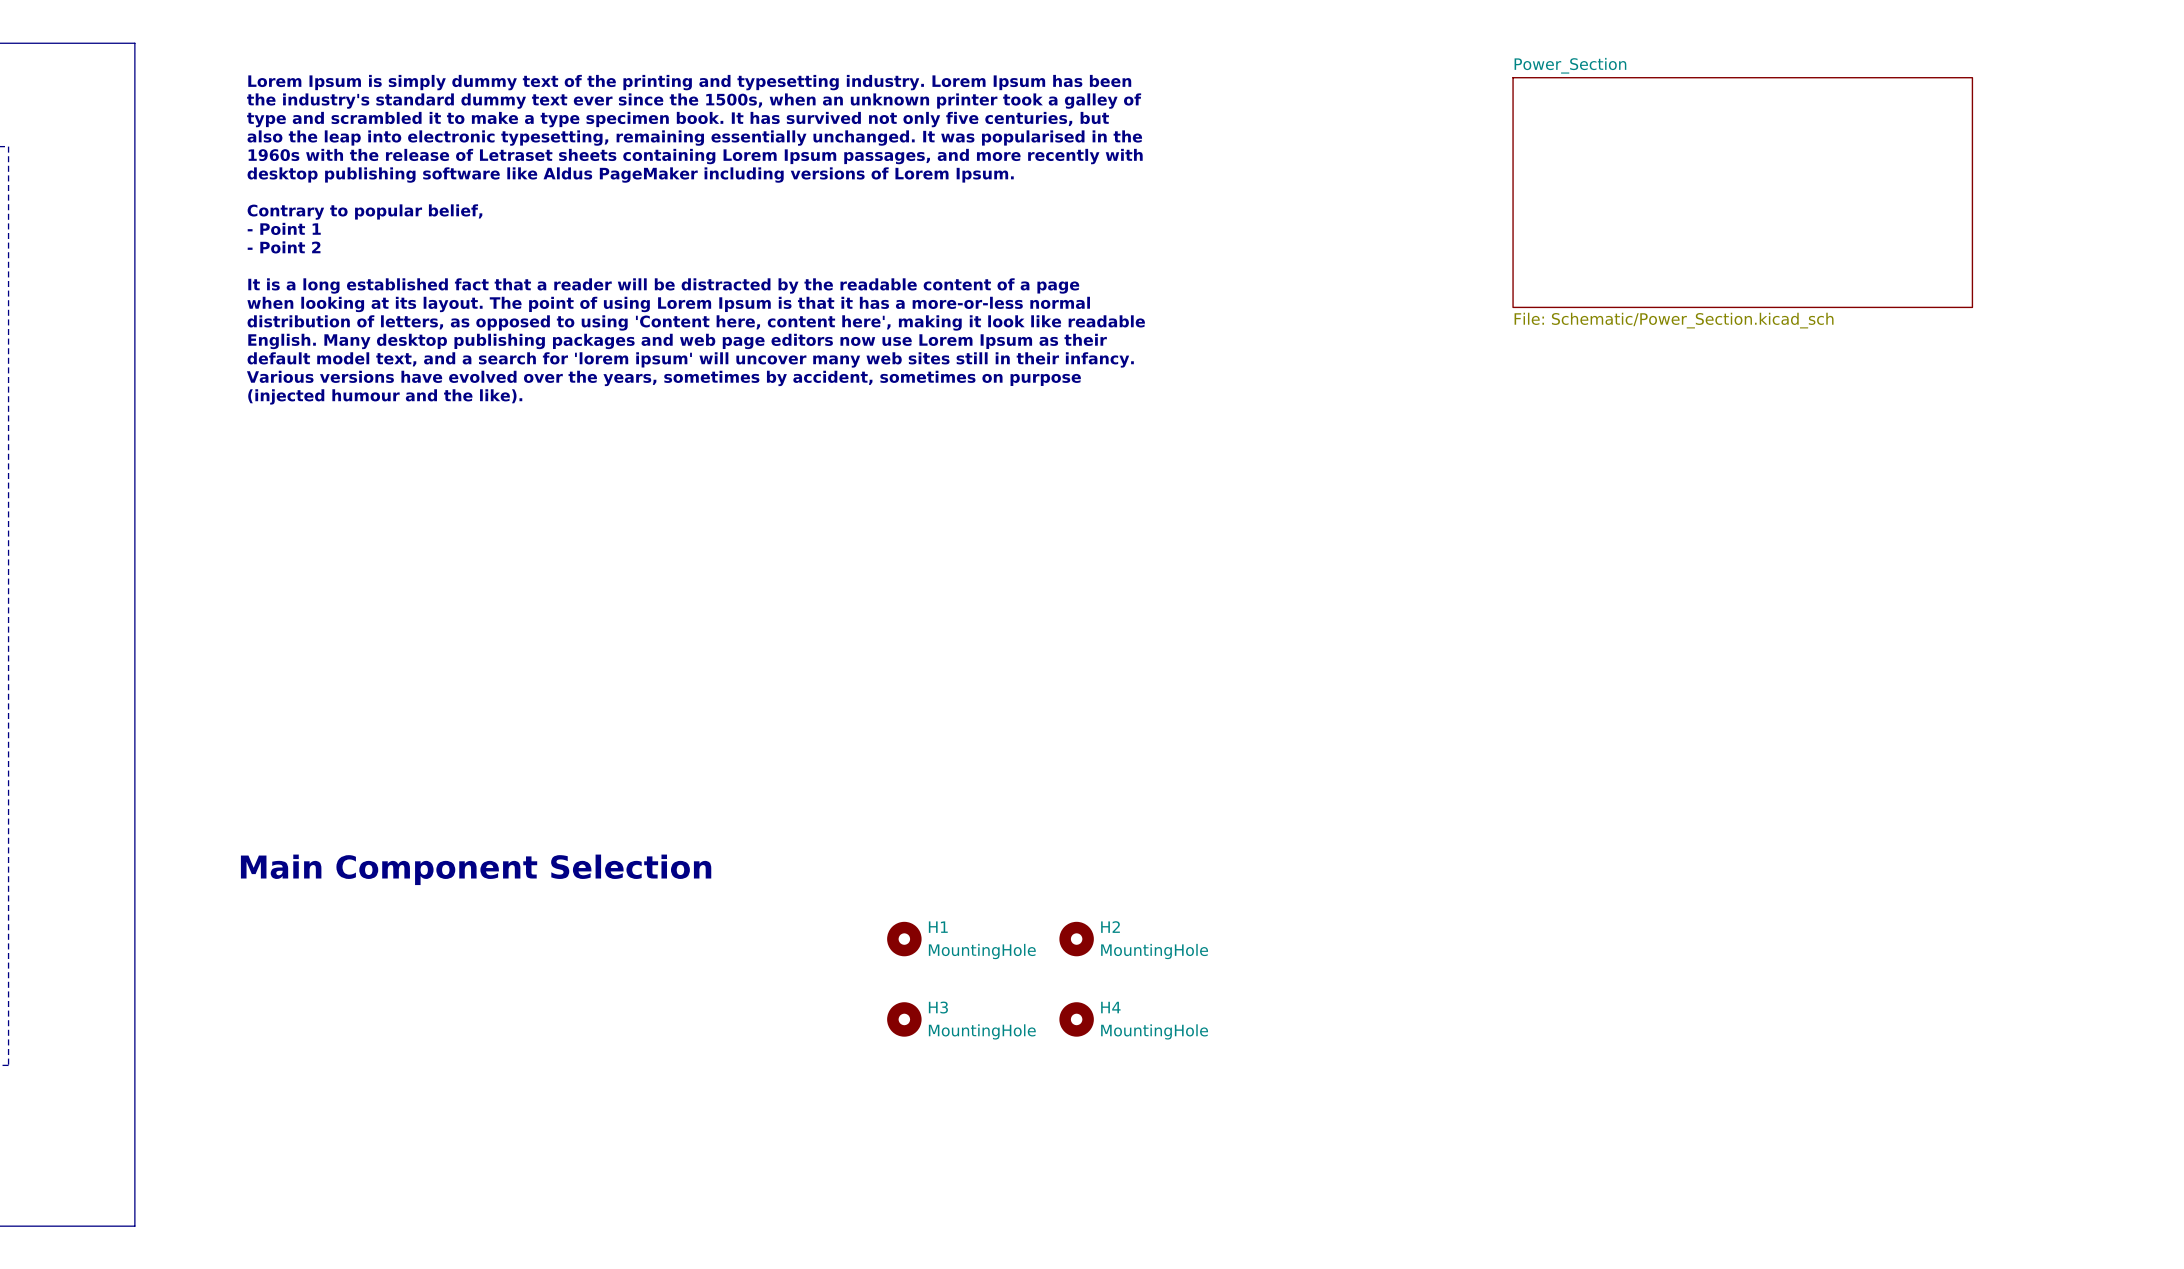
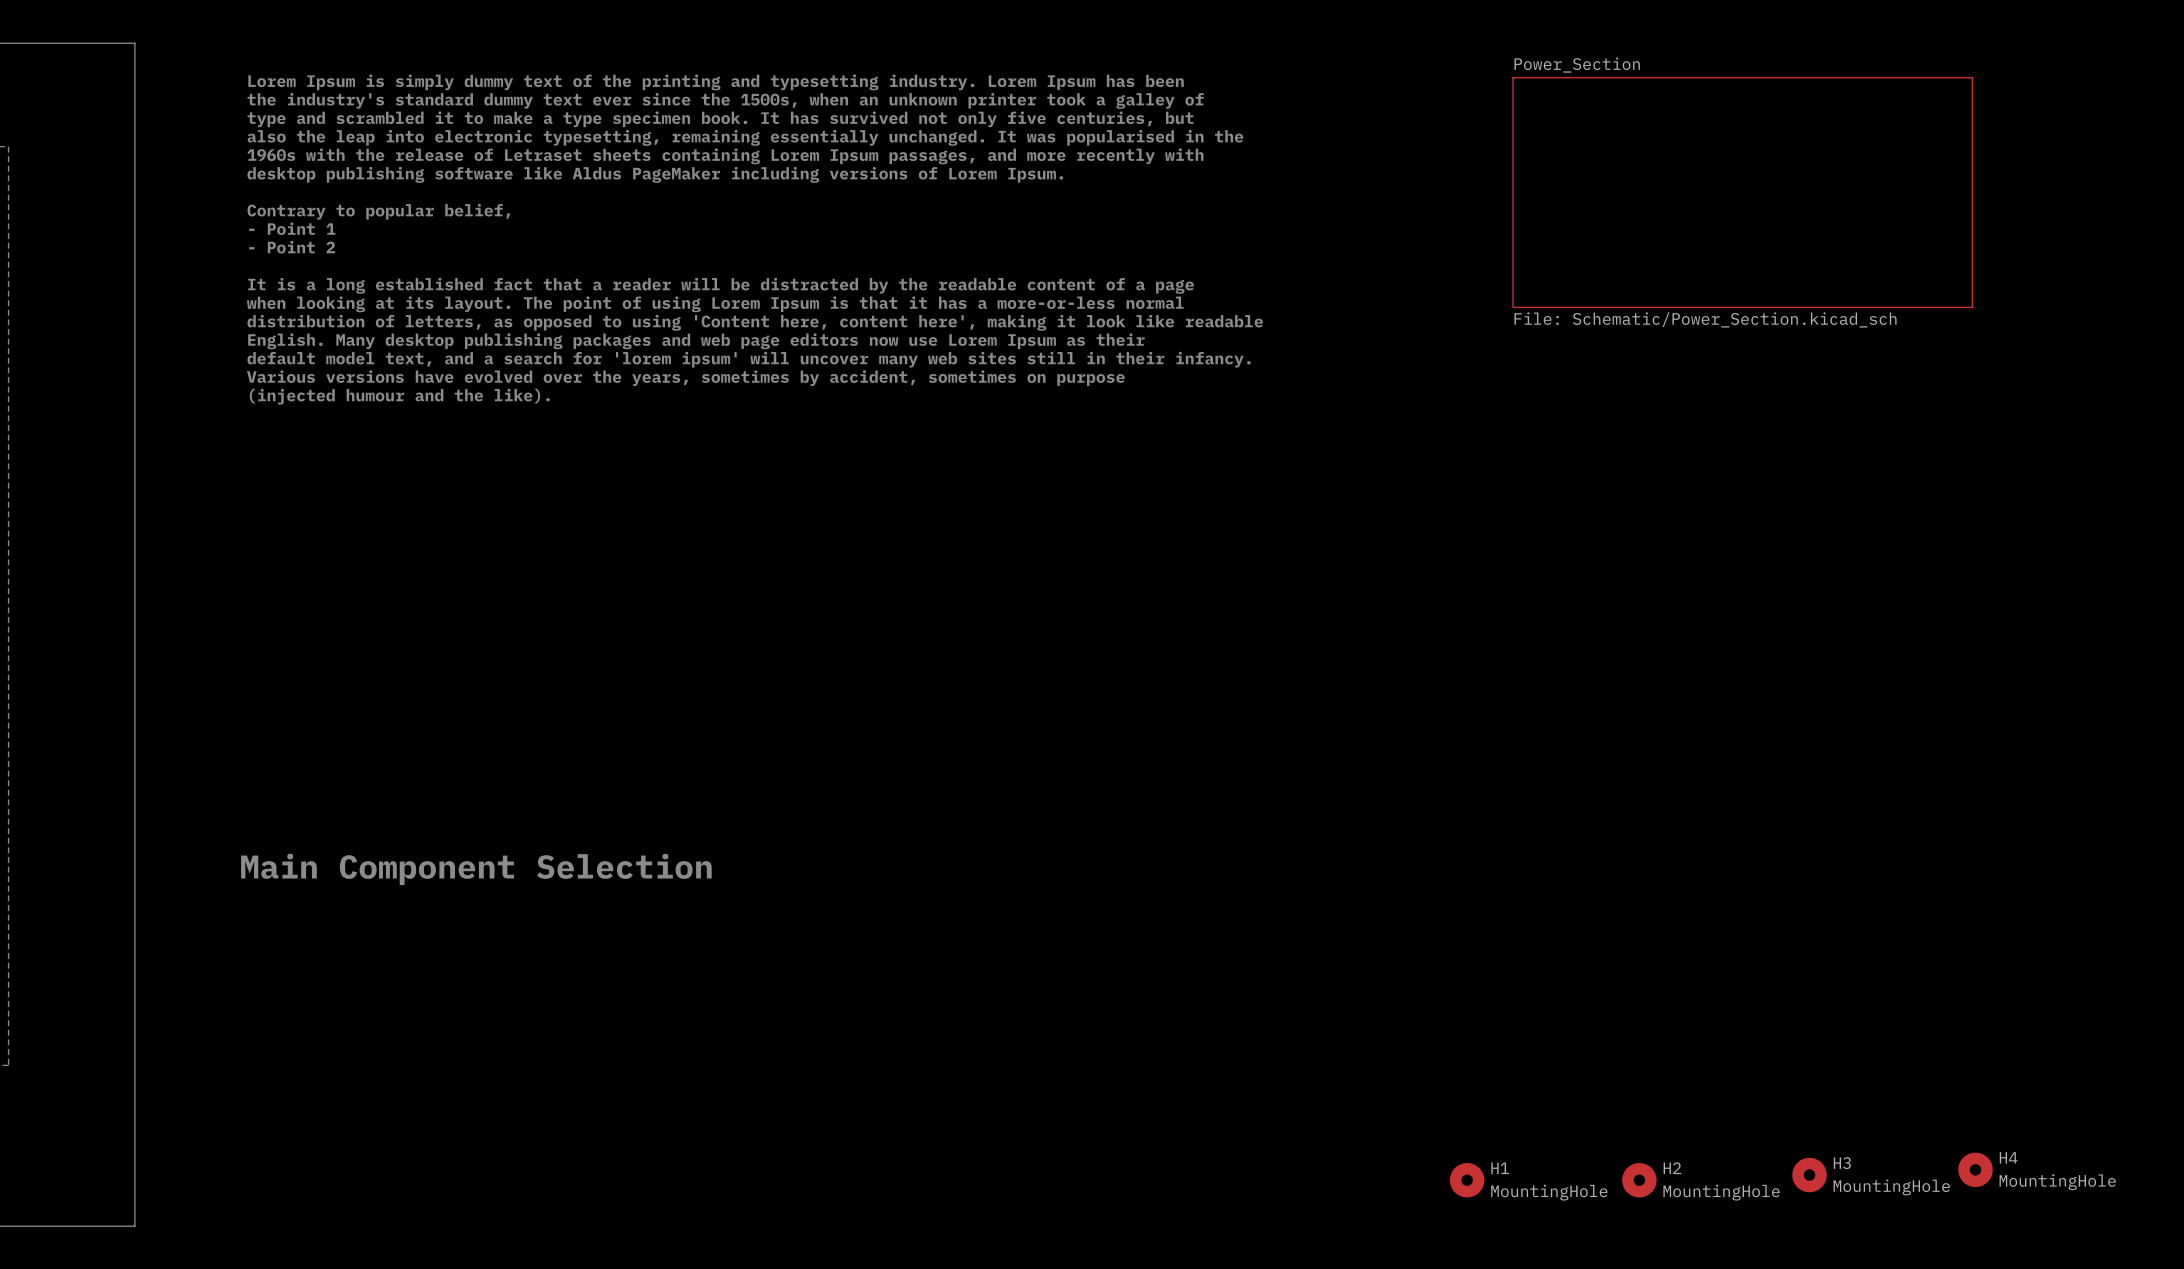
H1 position: (904, 939) -> (1467, 1180)
H2 position: (1076, 939) -> (1639, 1180)
H3 position: (904, 1019) -> (1809, 1175)
H4 position: (1076, 1019) -> (1975, 1169)

